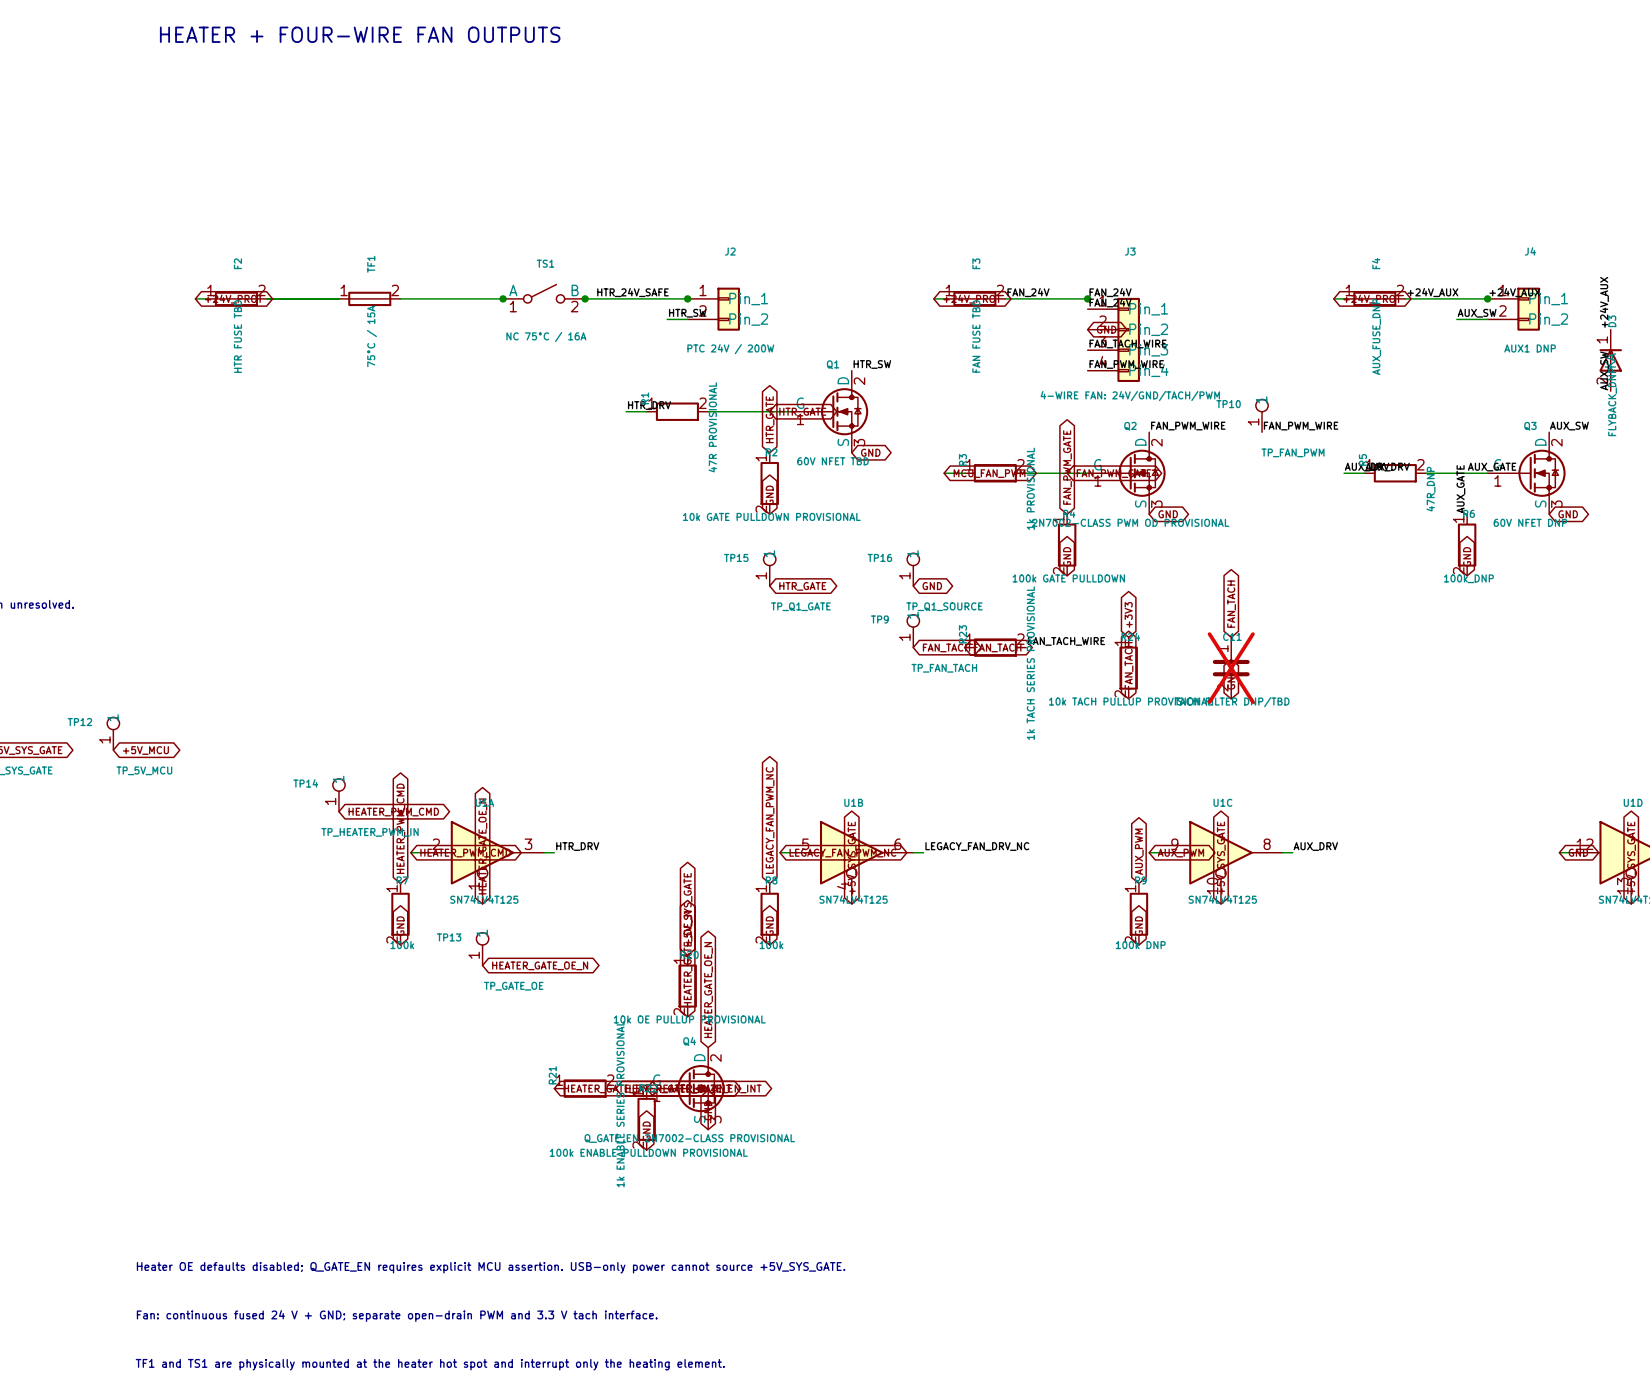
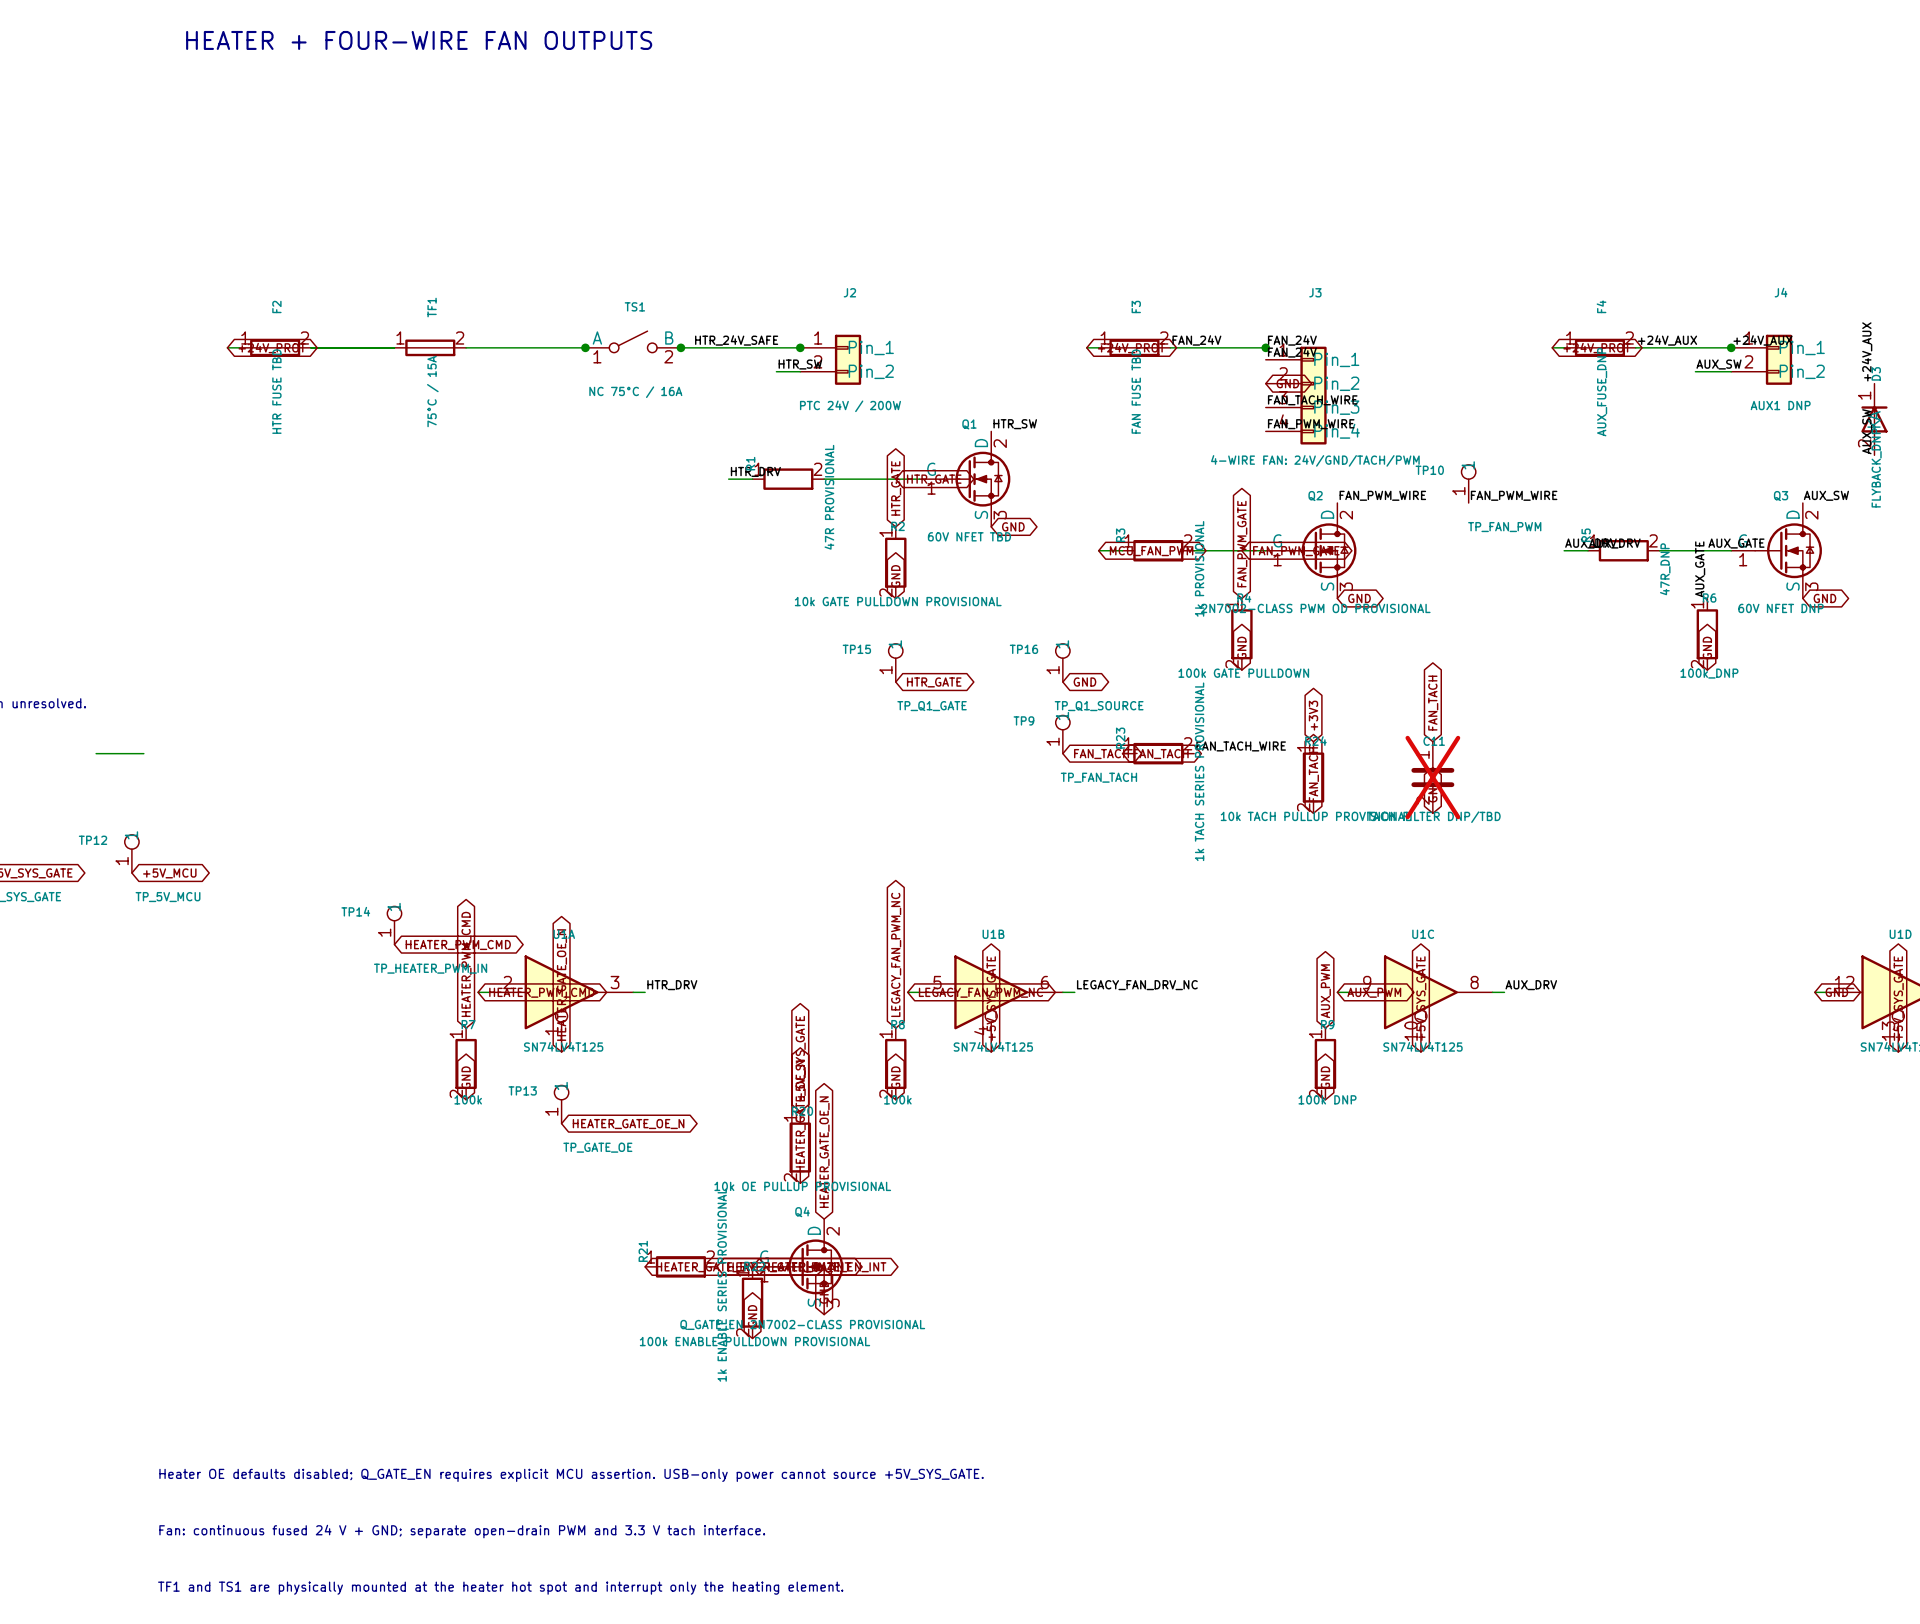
wire: none -> (96, 753) (143, 753)

